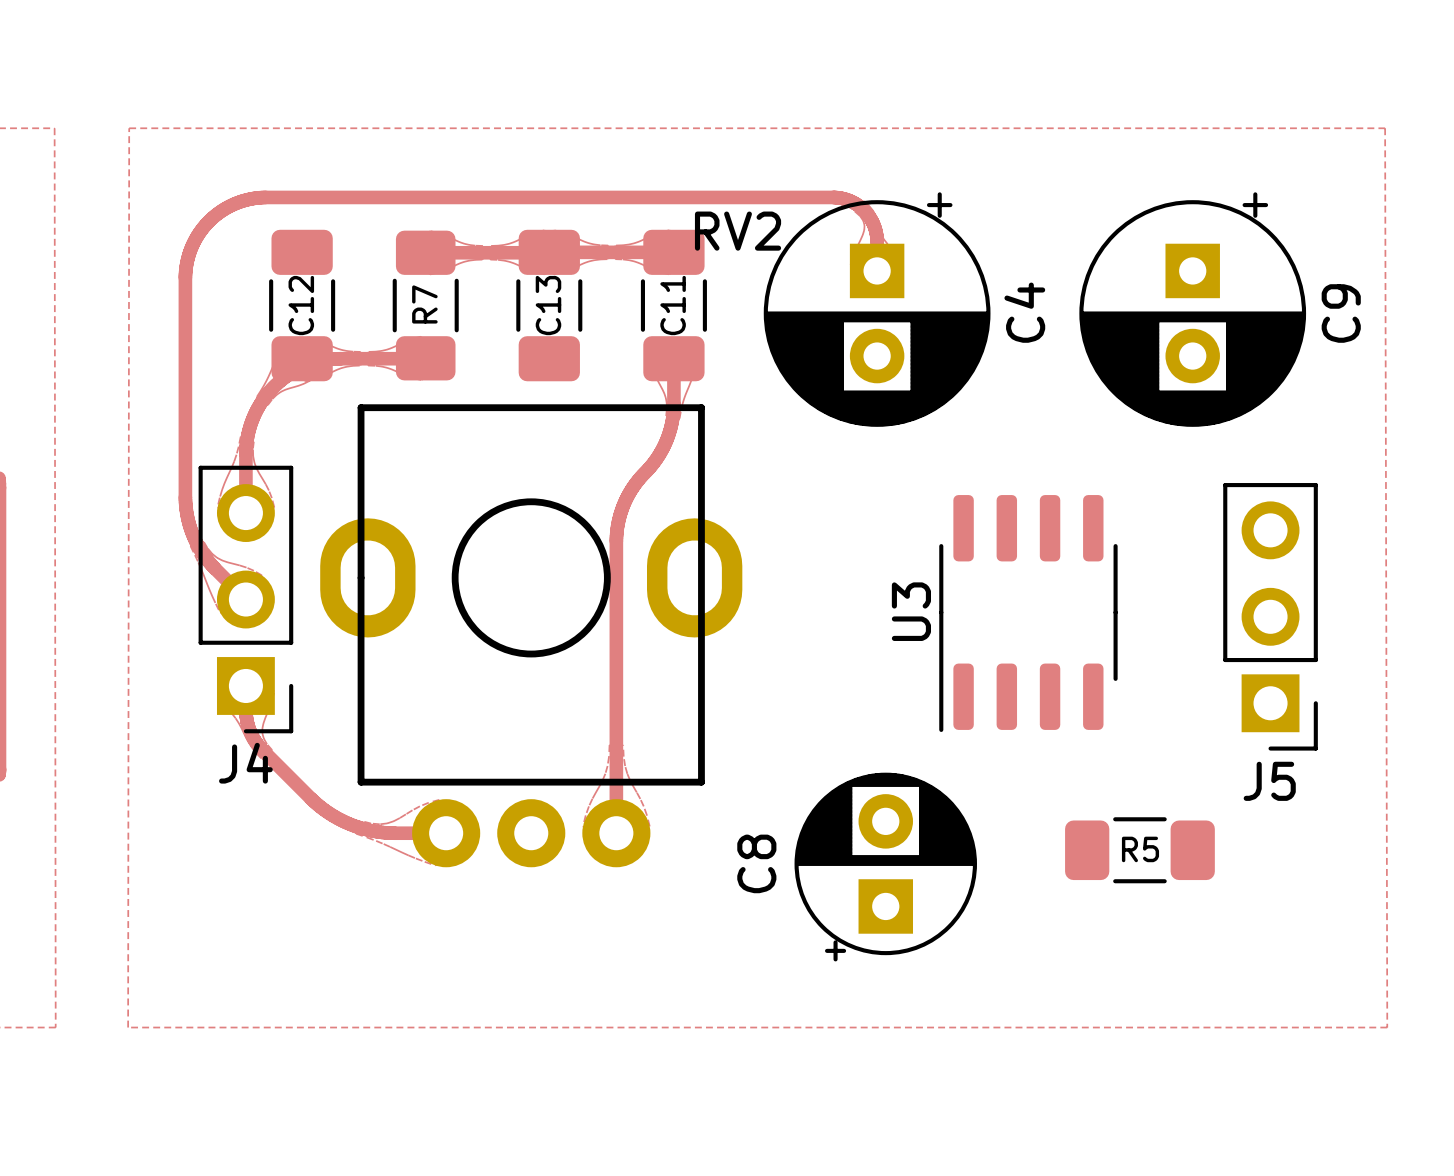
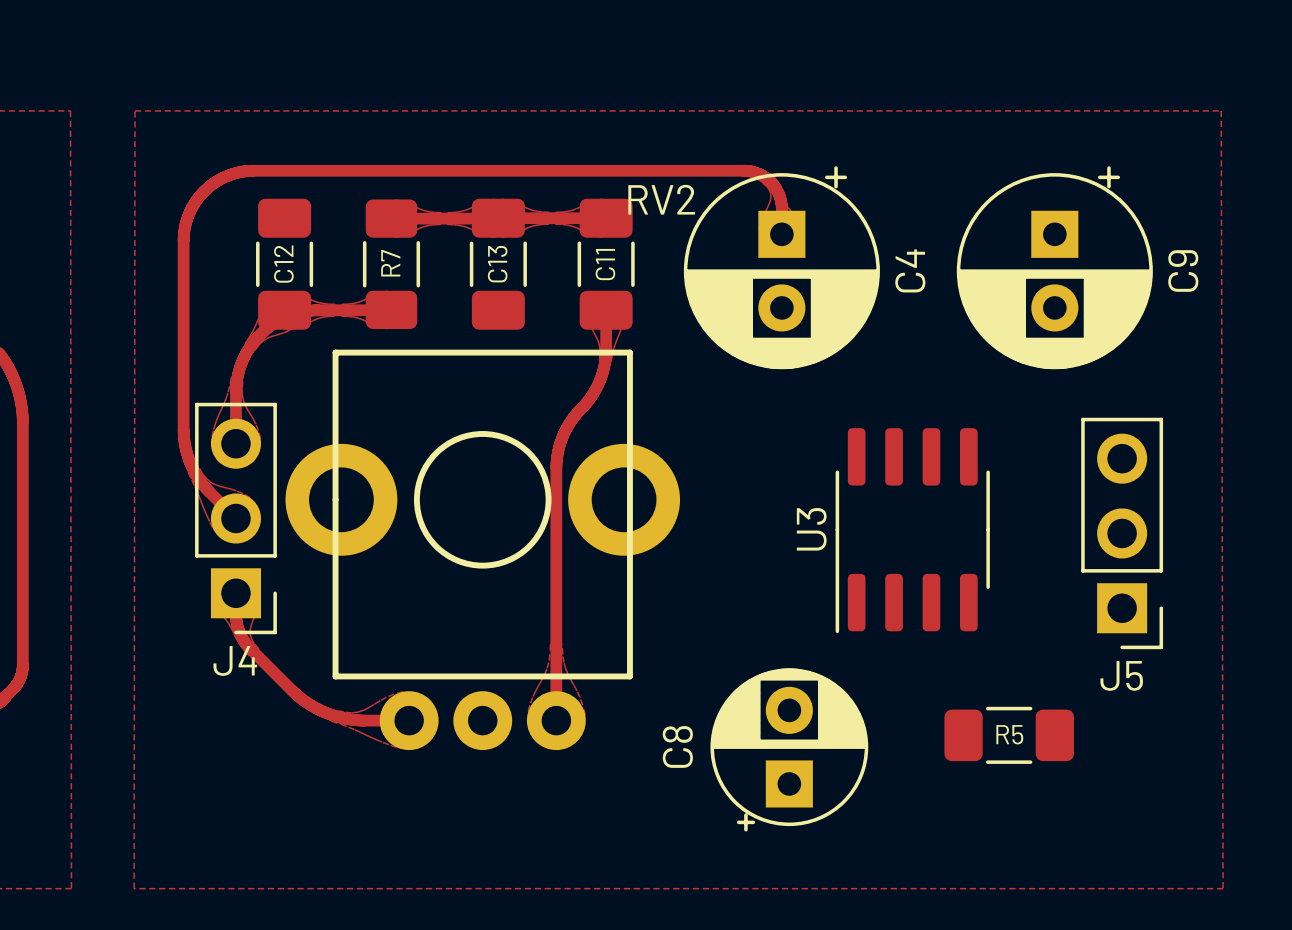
RV2 footprint: [320, 404, 743, 868] -> [285, 349, 681, 751]

